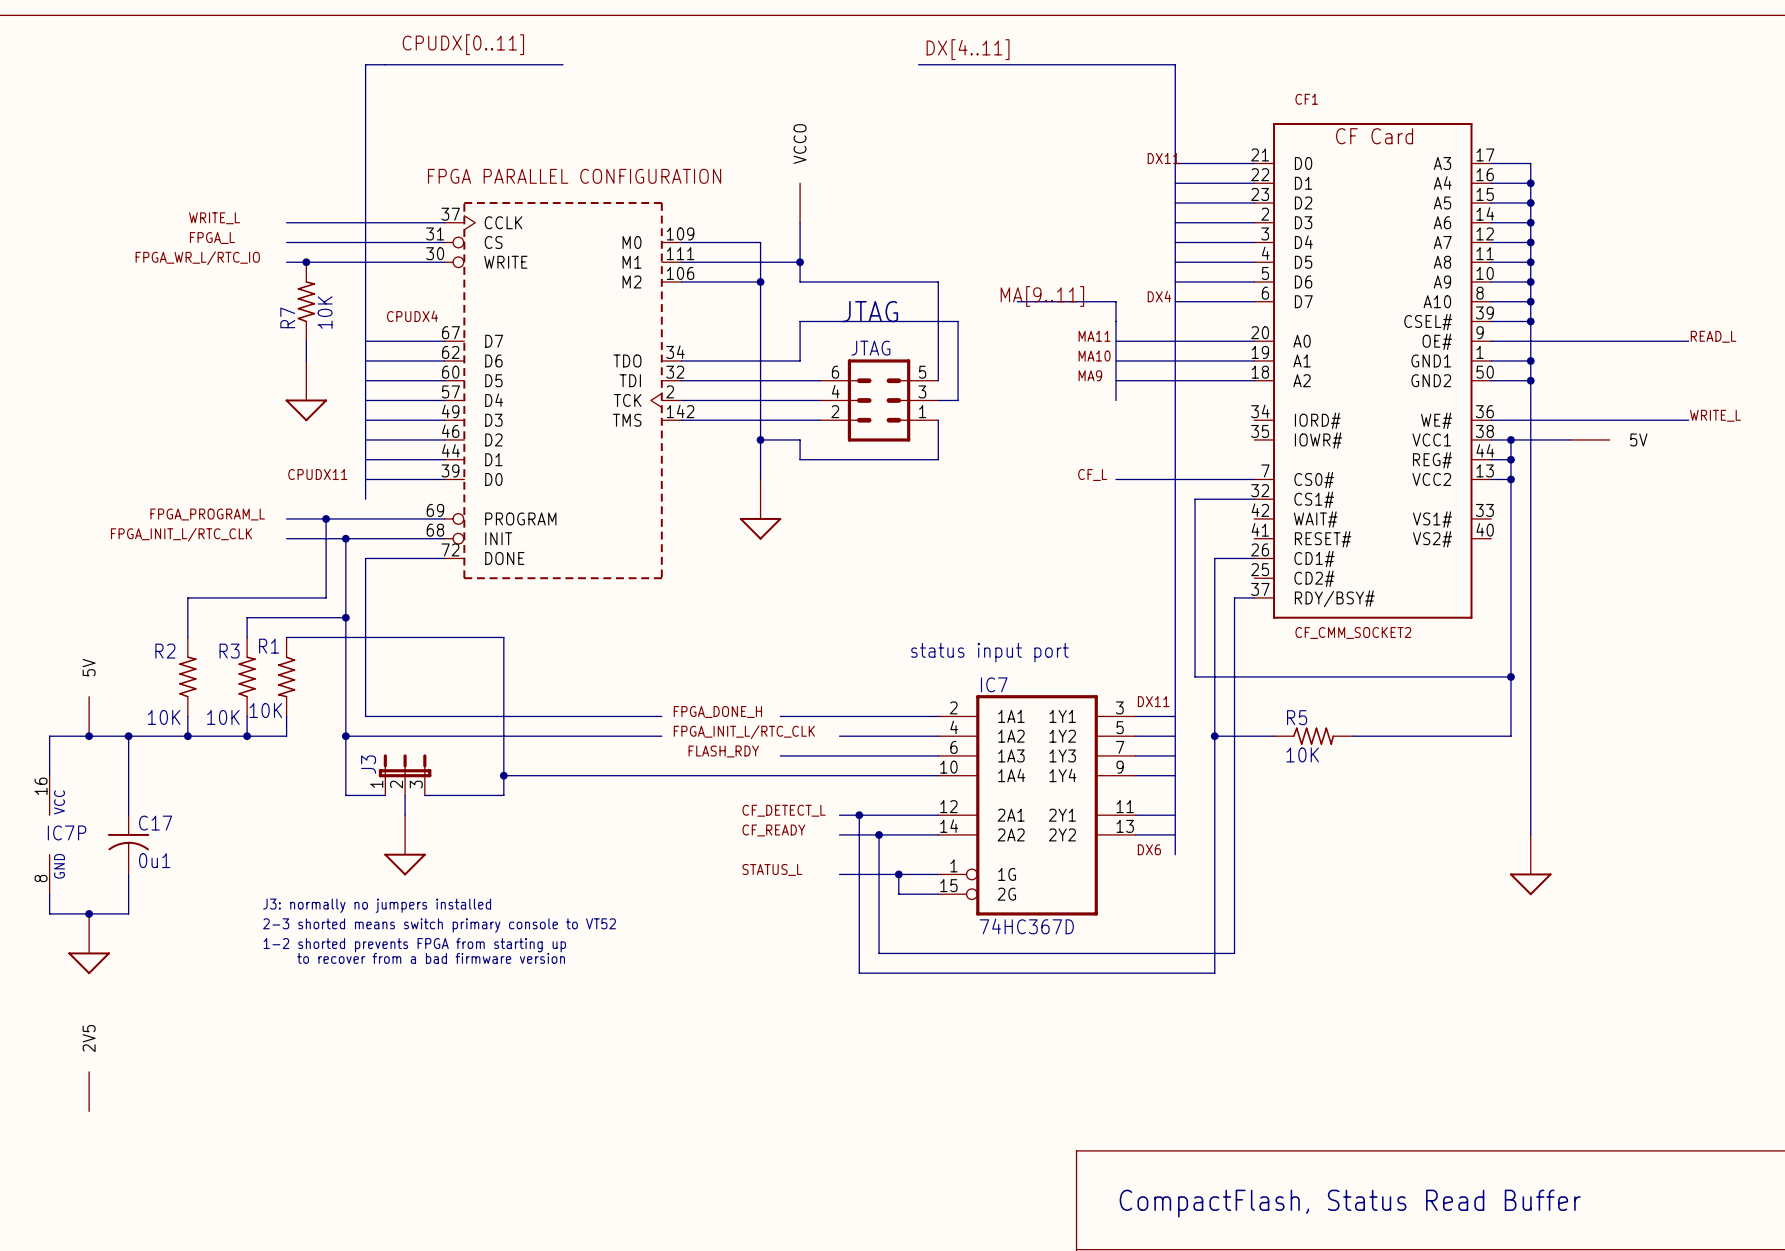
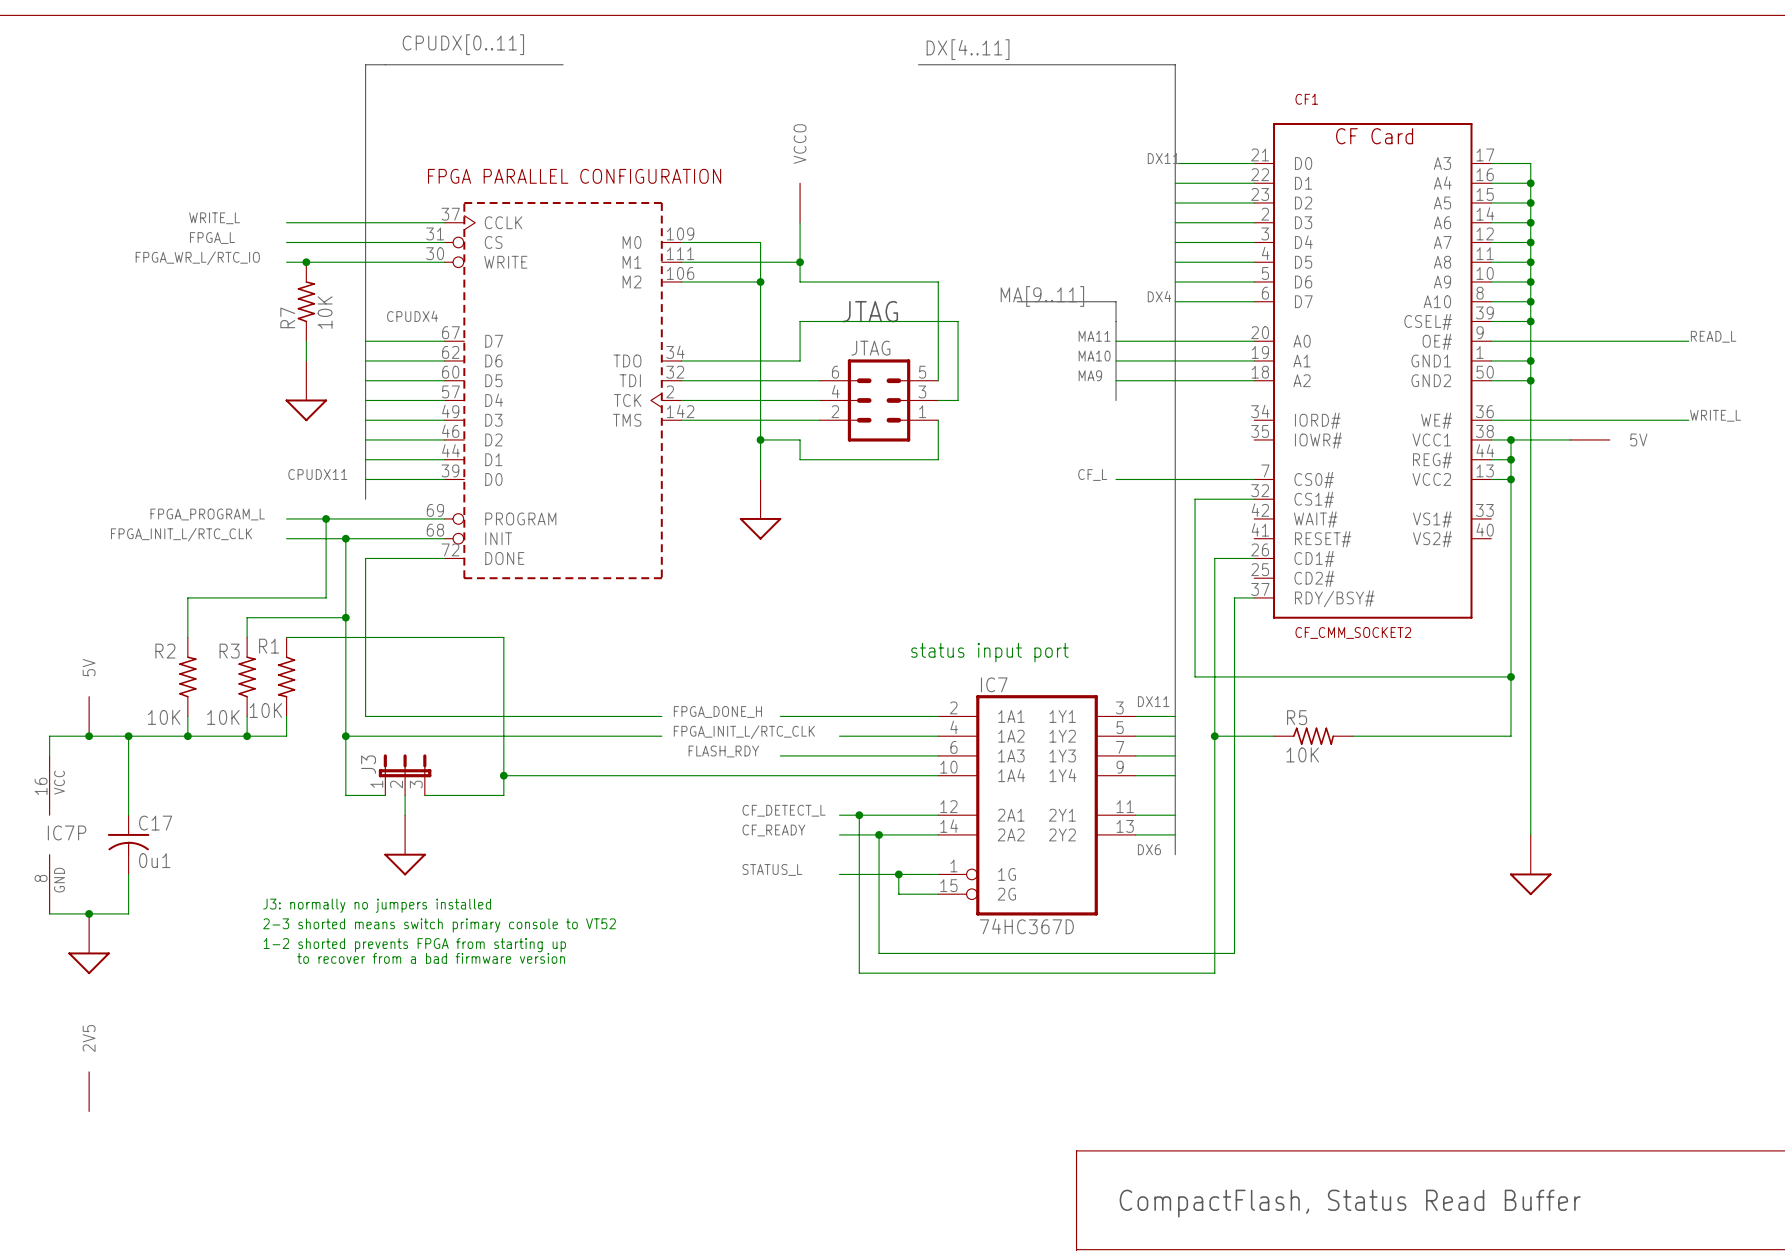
IC7P symbol: [49, 775, 50, 895] -> [49, 755, 50, 914]

